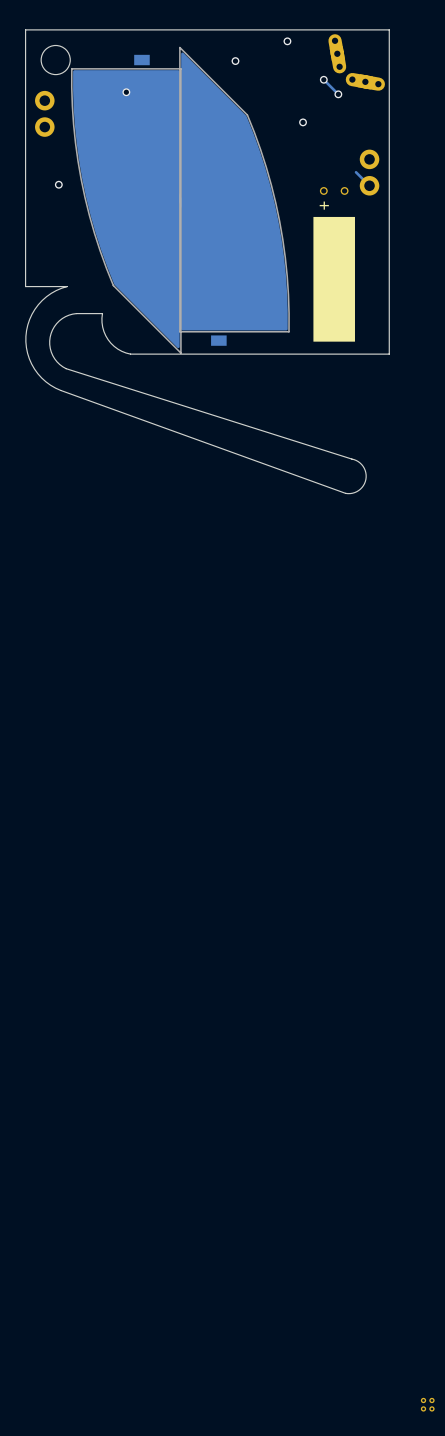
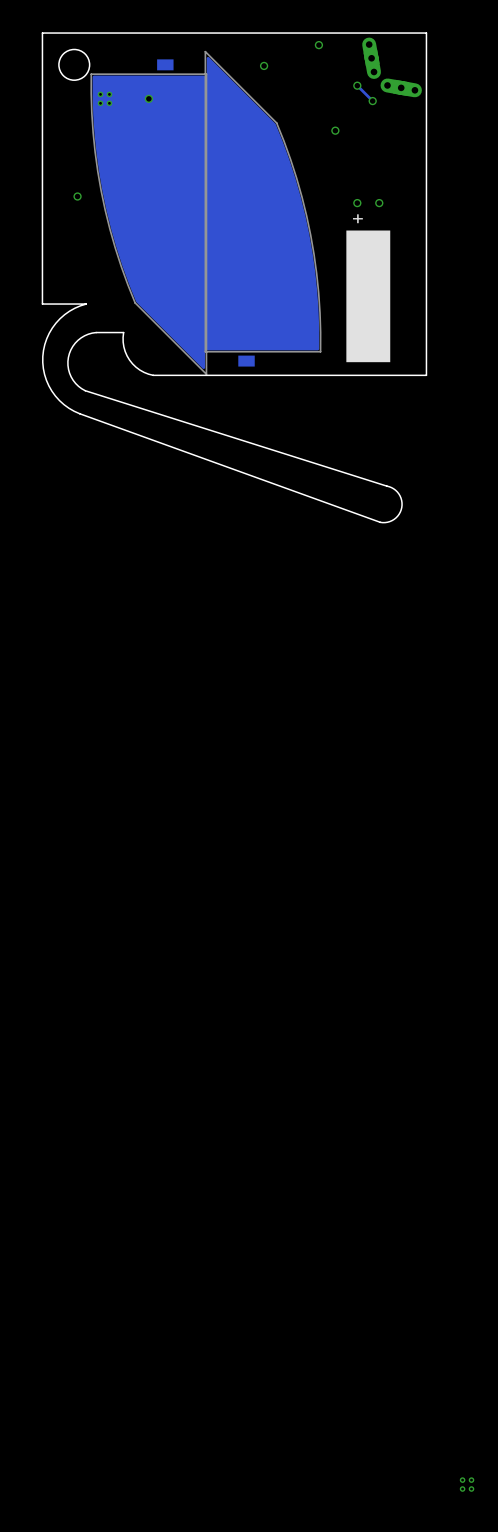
part: none -> (104, 98)
part: (44, 113) -> none
track: (356, 172) (369, 185) -> none
part: (369, 172) -> none

